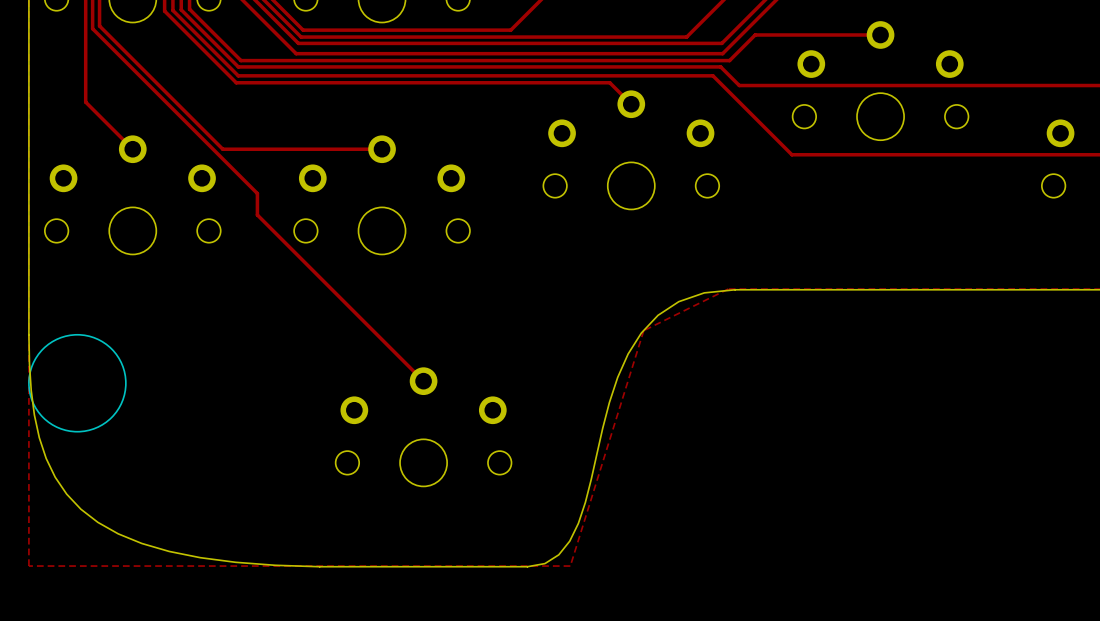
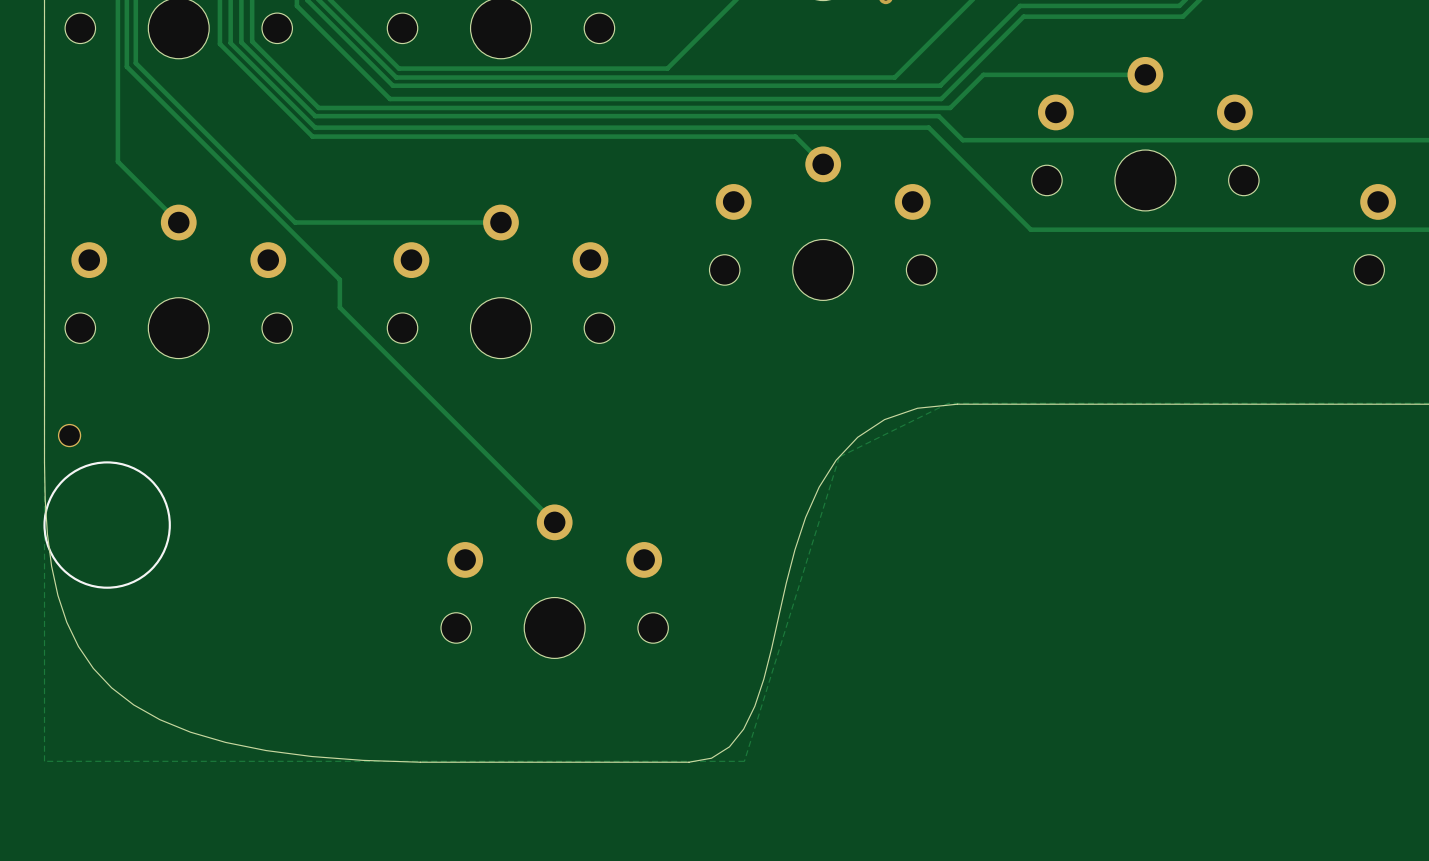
part: none -> (69, 435)

